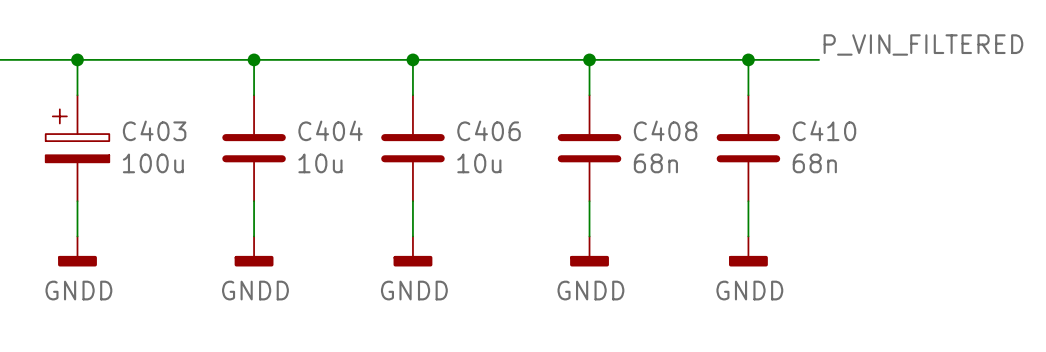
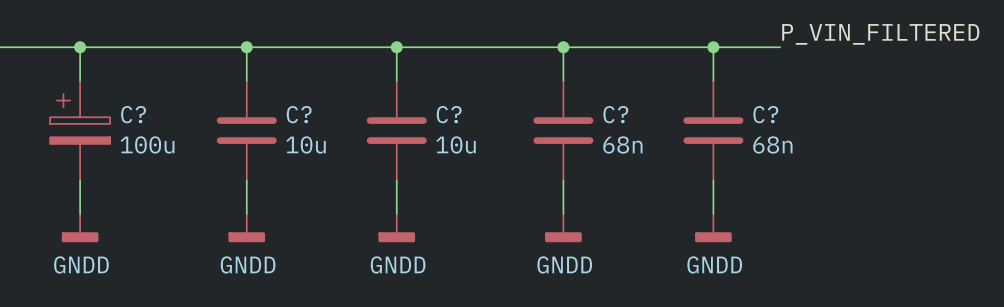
C403 name: C403 (154, 130) -> C? (133, 114)
C404 name: C404 (330, 130) -> C? (299, 114)
C406 name: C406 (489, 130) -> C? (449, 114)
C408 name: C408 (665, 130) -> C? (615, 114)
C410 name: C410 (824, 130) -> C? (765, 114)

